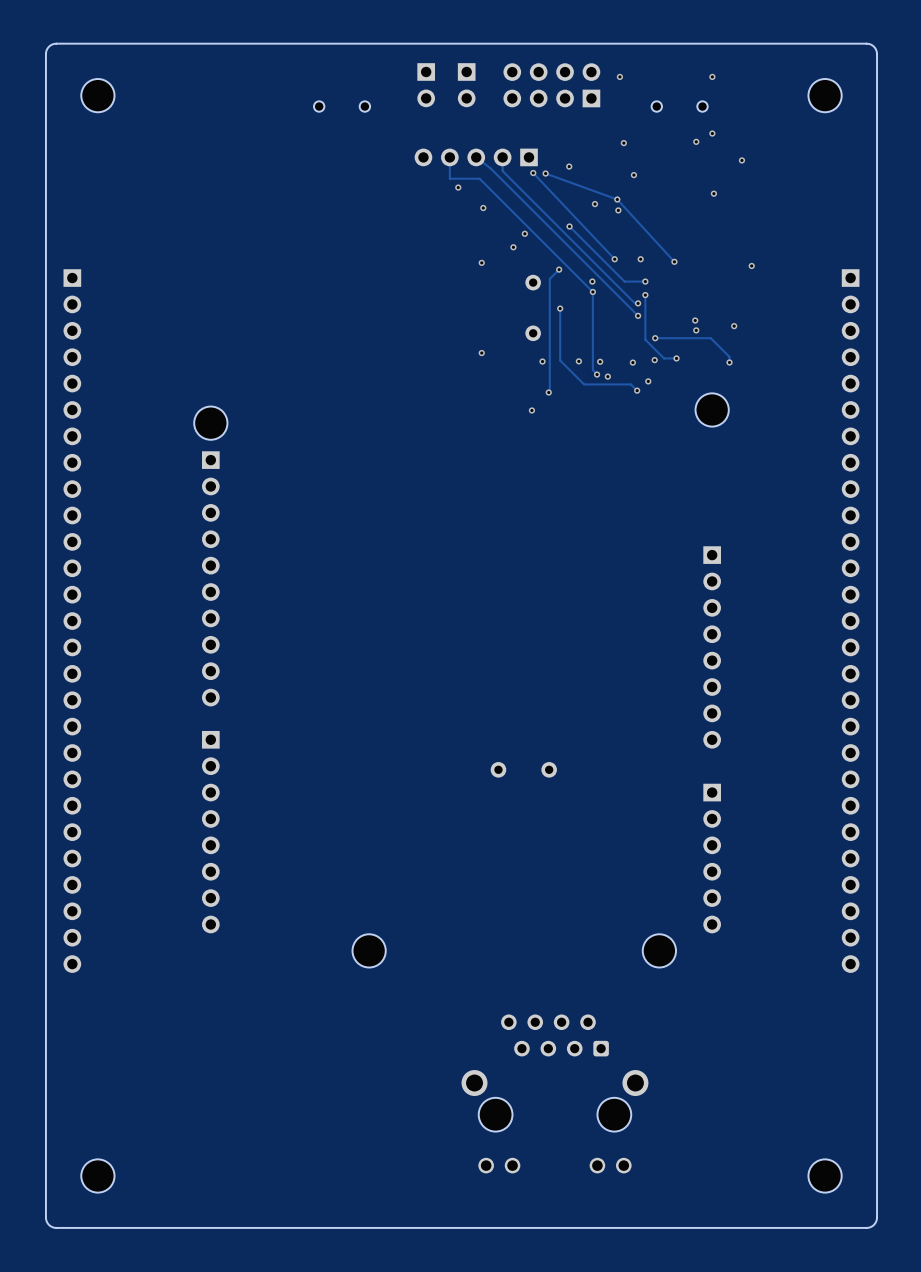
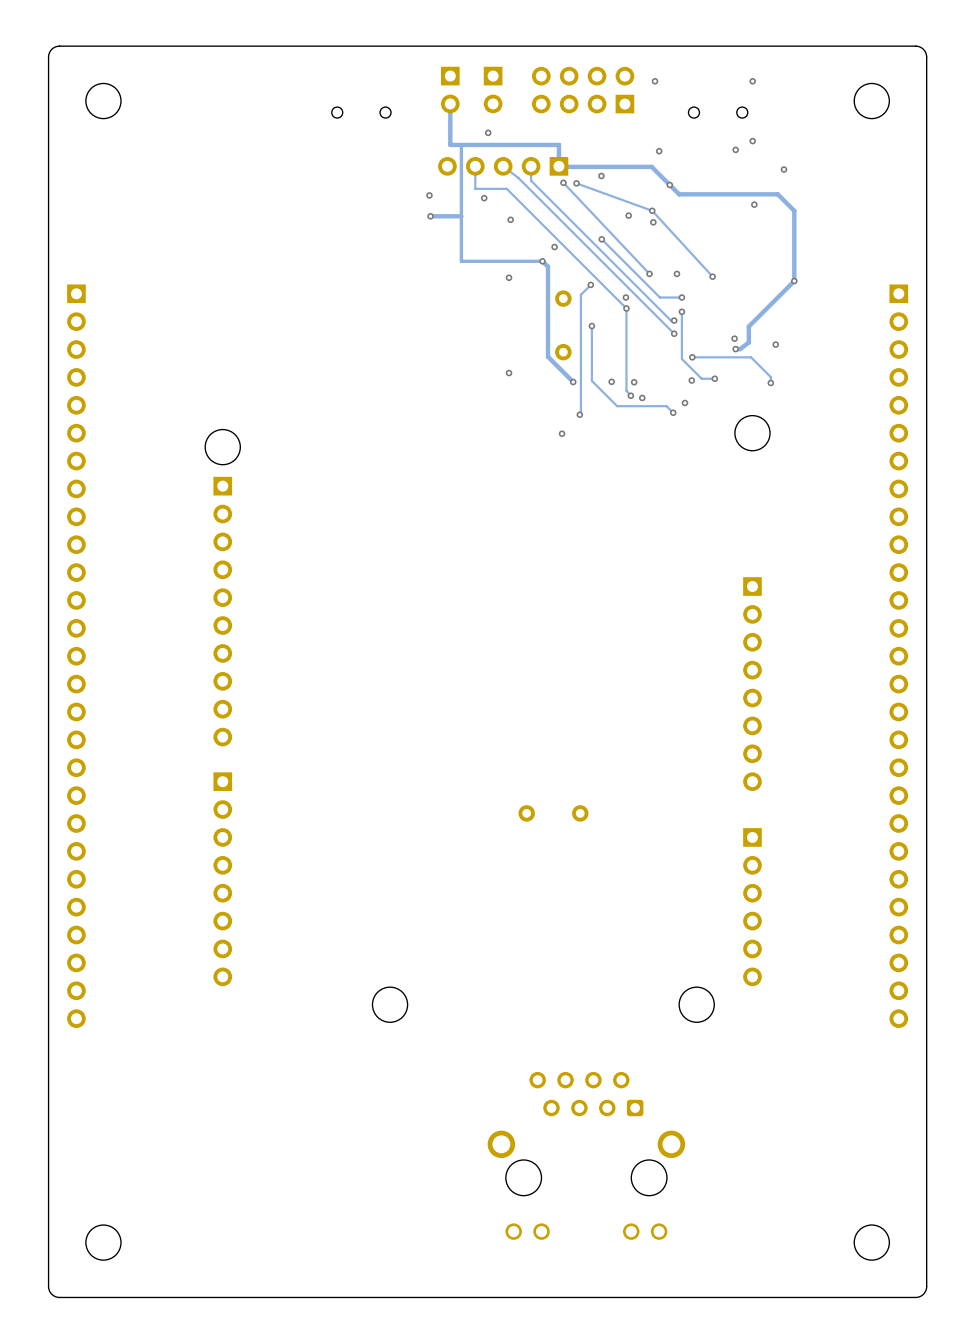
track: none -> (450, 103) (450, 144) (558, 144) (558, 166) (651, 166) (679, 194) (777, 194) (794, 210) (794, 281) (748, 326) (748, 342) (740, 349) (735, 349)
via: none -> (488, 132)
track: none -> (461, 144) (461, 261) (542, 261) (547, 266) (547, 356) (573, 382)
via: none -> (429, 195)
via: none -> (430, 216)
track: none -> (461, 216) (430, 216)
via: (632, 362) -> none

